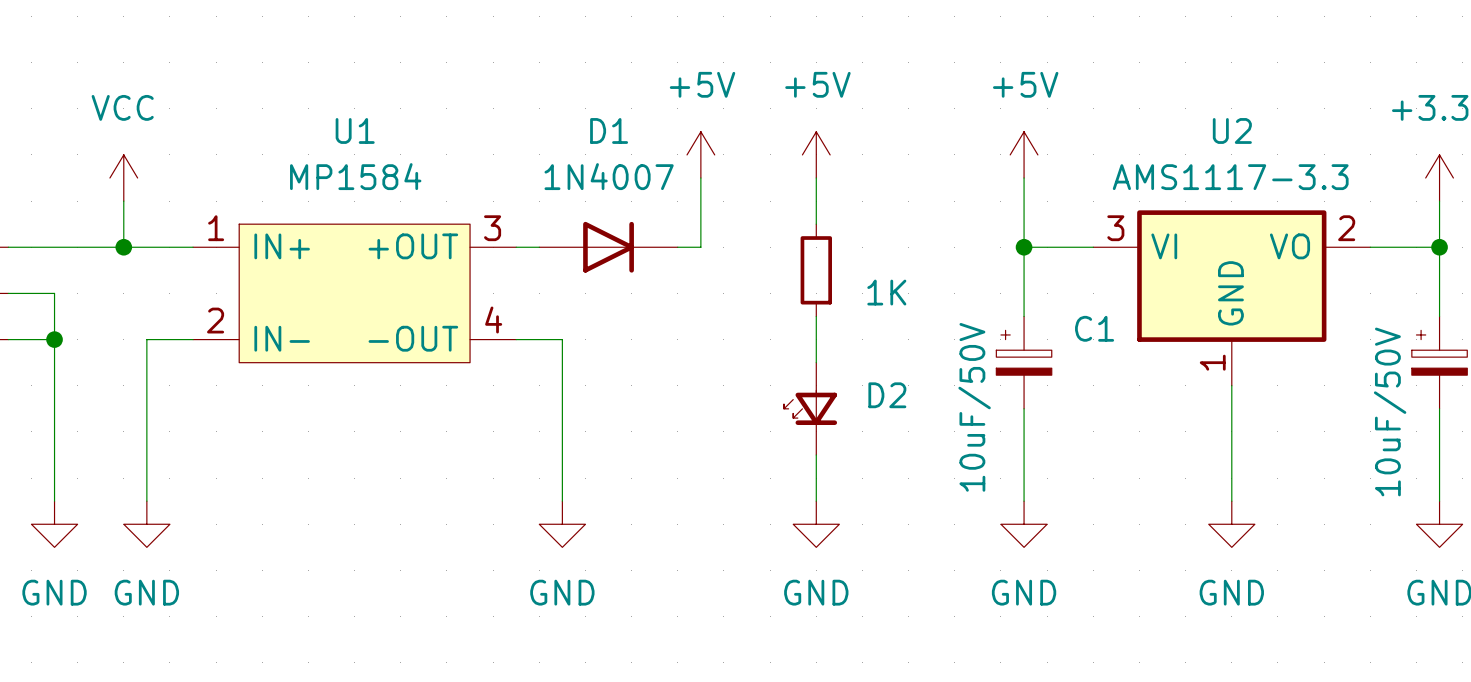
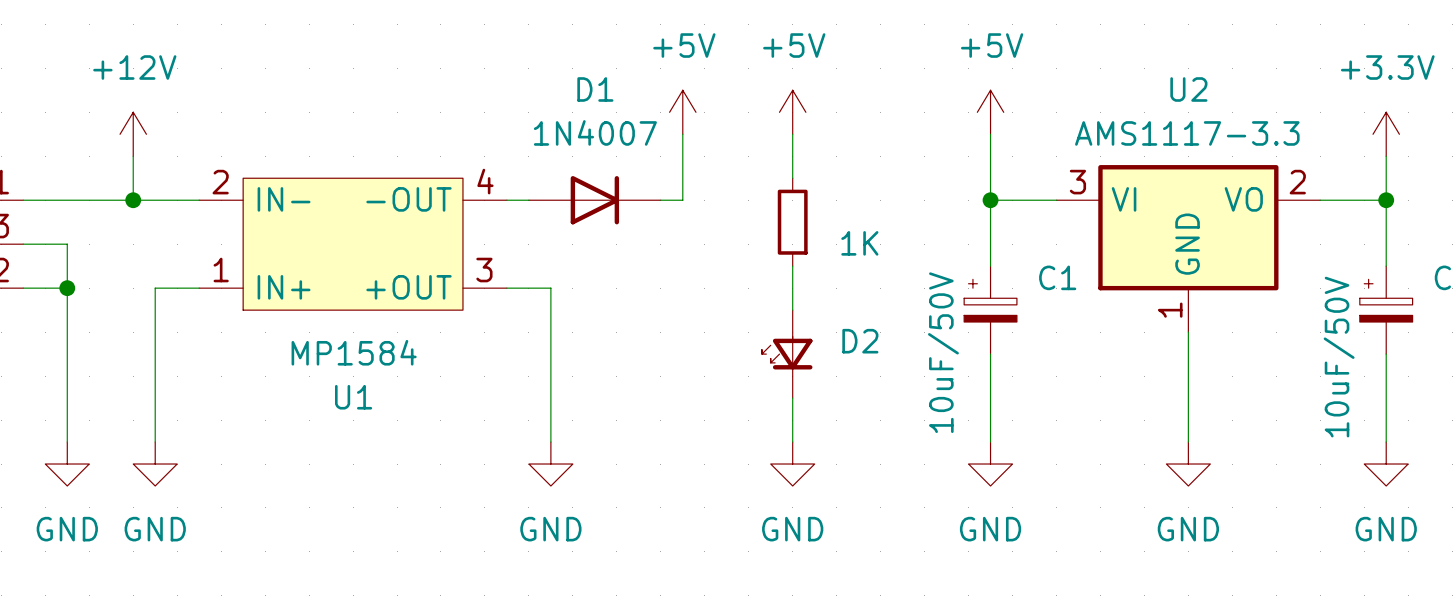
power symbol: VCC (123, 178) -> +12V (133, 134)
U1 flip: as is (354, 293) -> up-down (353, 244)

